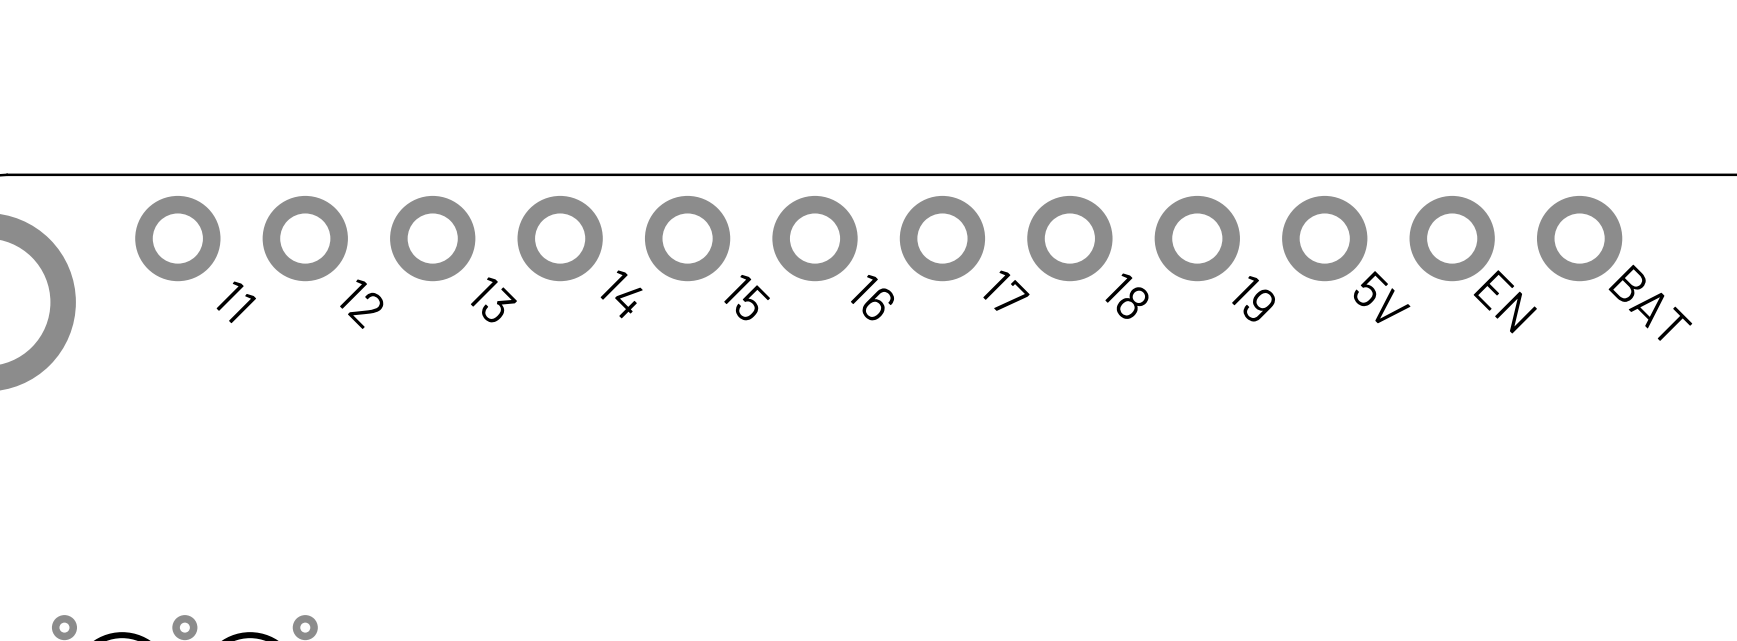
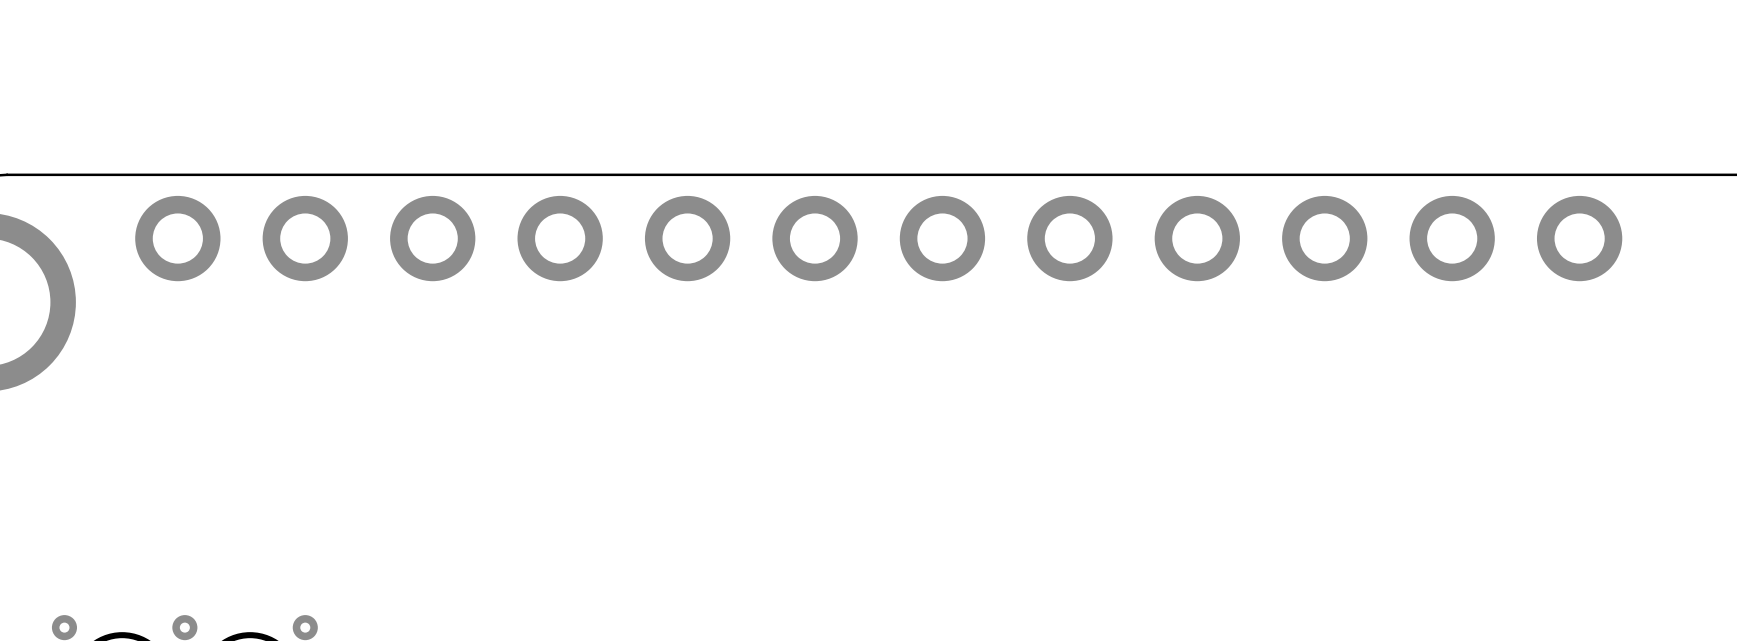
text: 17 (1006, 290) -> none
text: 14 (621, 294) -> none
text: 18 (1127, 296) -> none
text: 15 (747, 297) -> none
text: 16 (872, 297) -> none
text: 5V (1382, 297) -> none
text: 19 (1253, 298) -> none
text: 13 (493, 300) -> none
text: EN (1505, 301) -> none
text: 11 (236, 302) -> none
text: BAT (1650, 302) -> none
text: 12 (361, 304) -> none

